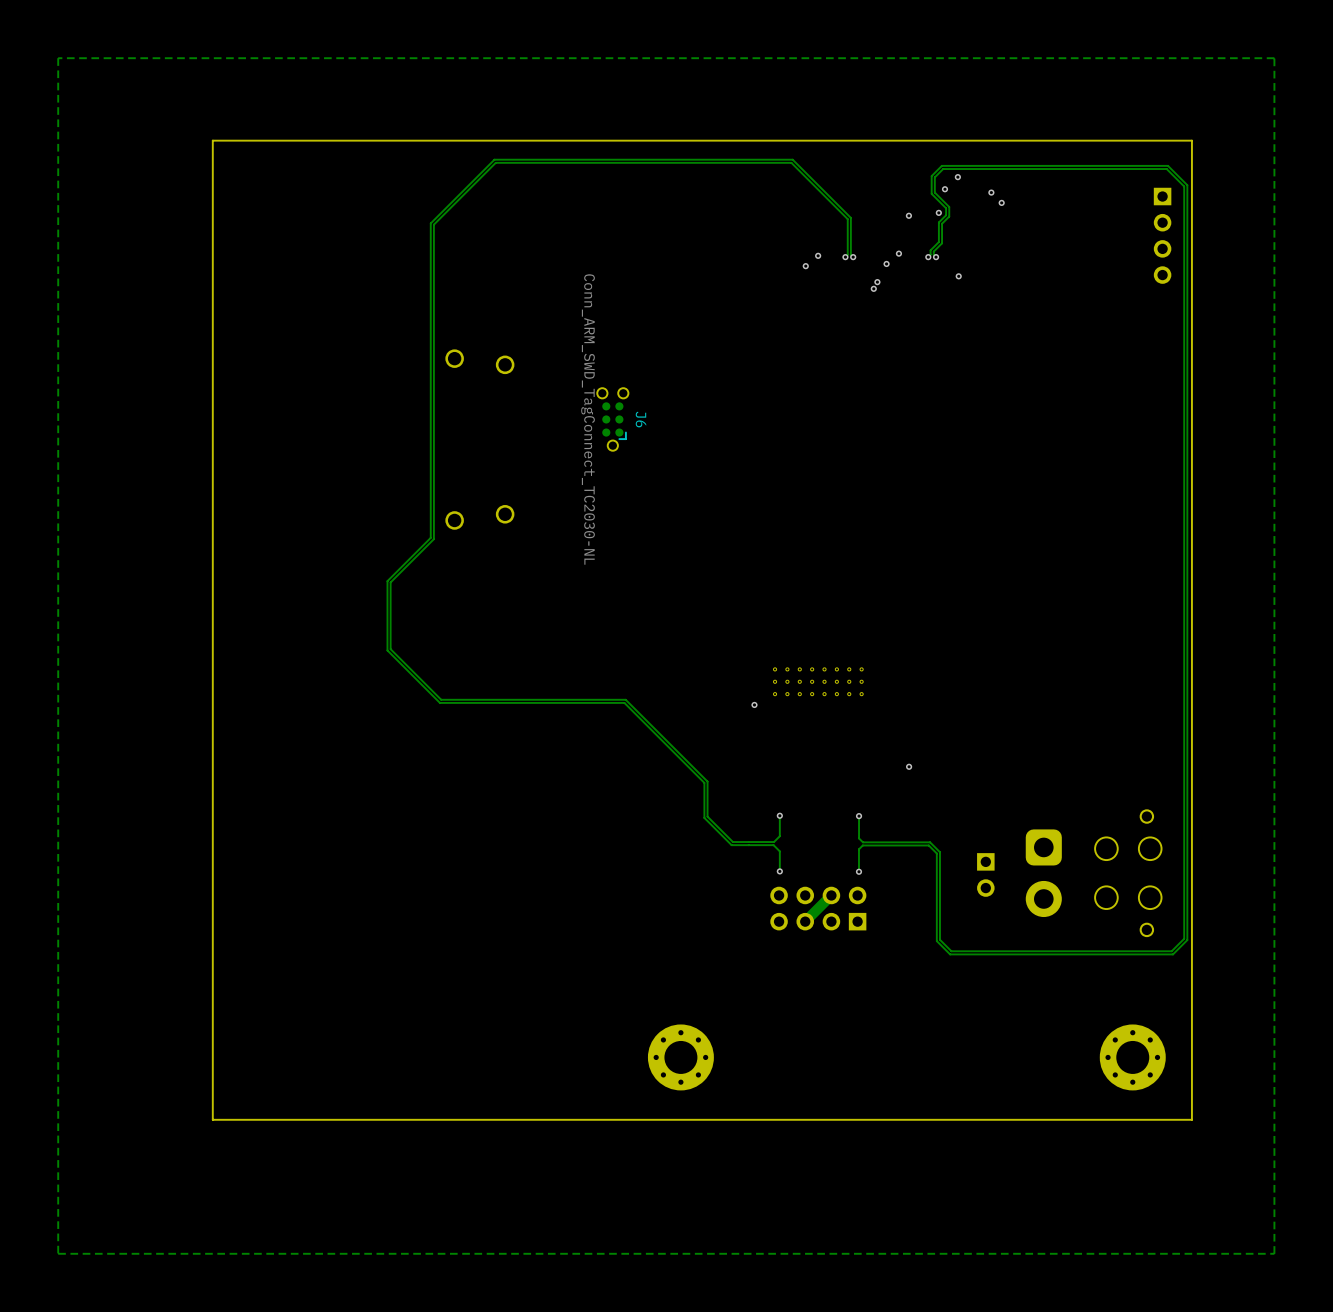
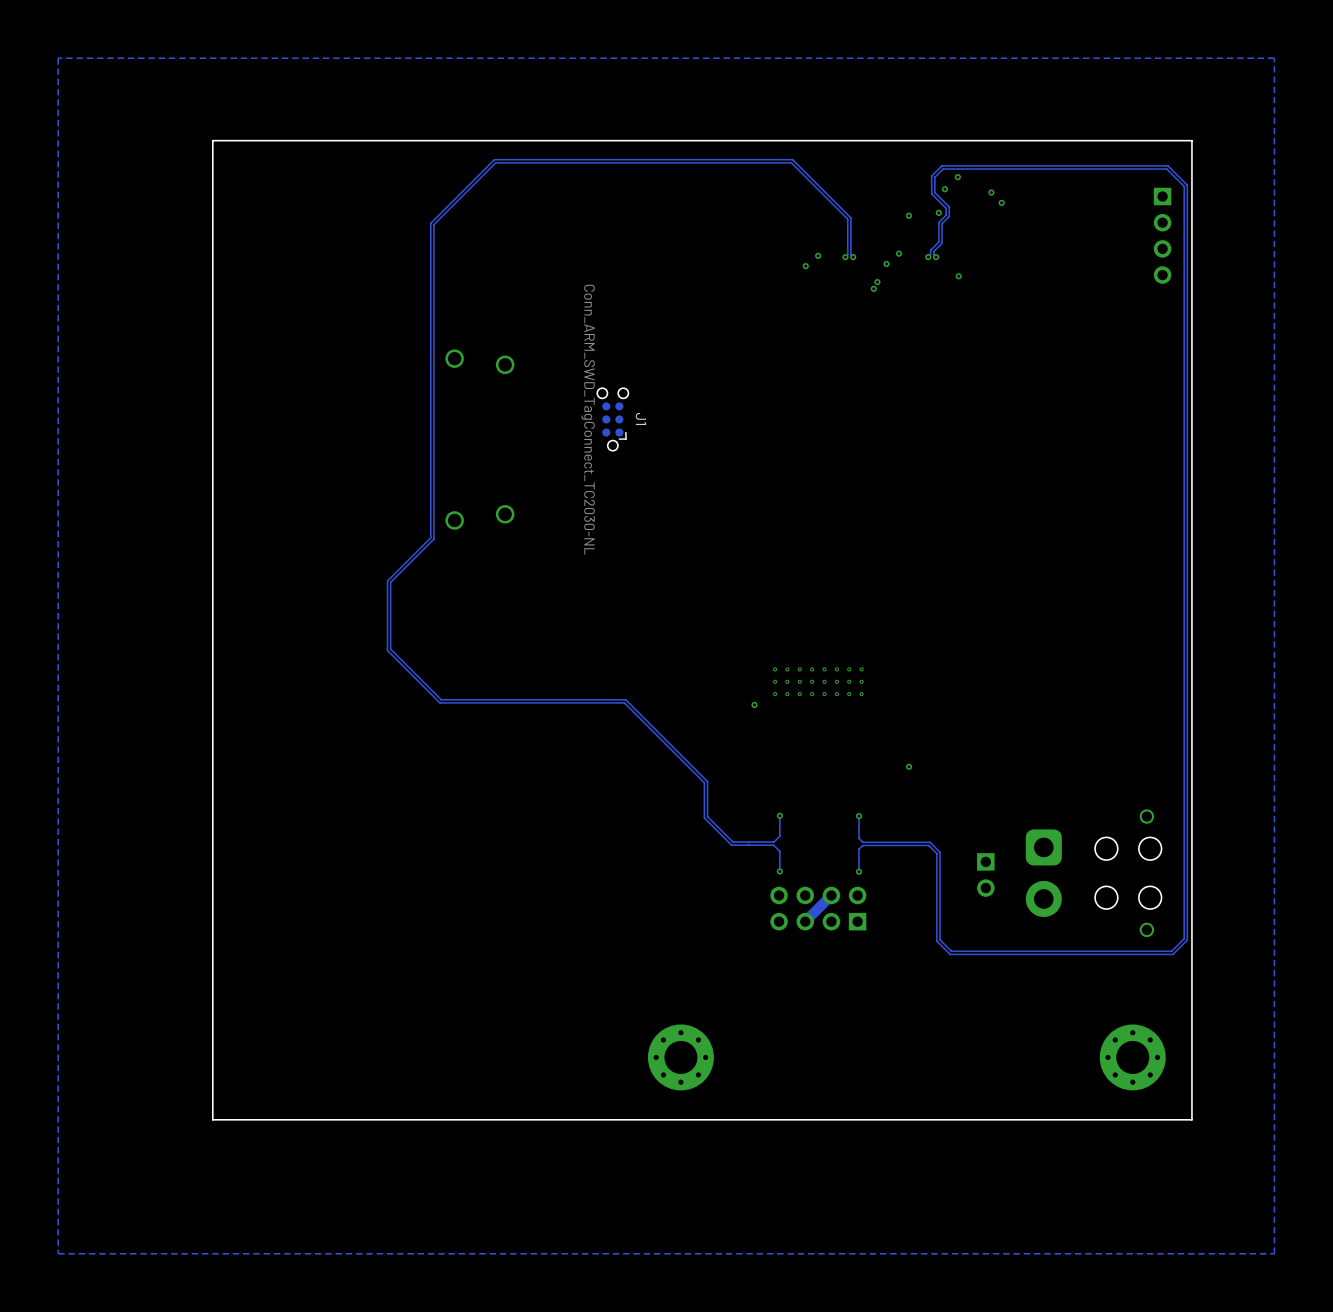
J6 name: J6 (640, 419) -> J1 (640, 418)

